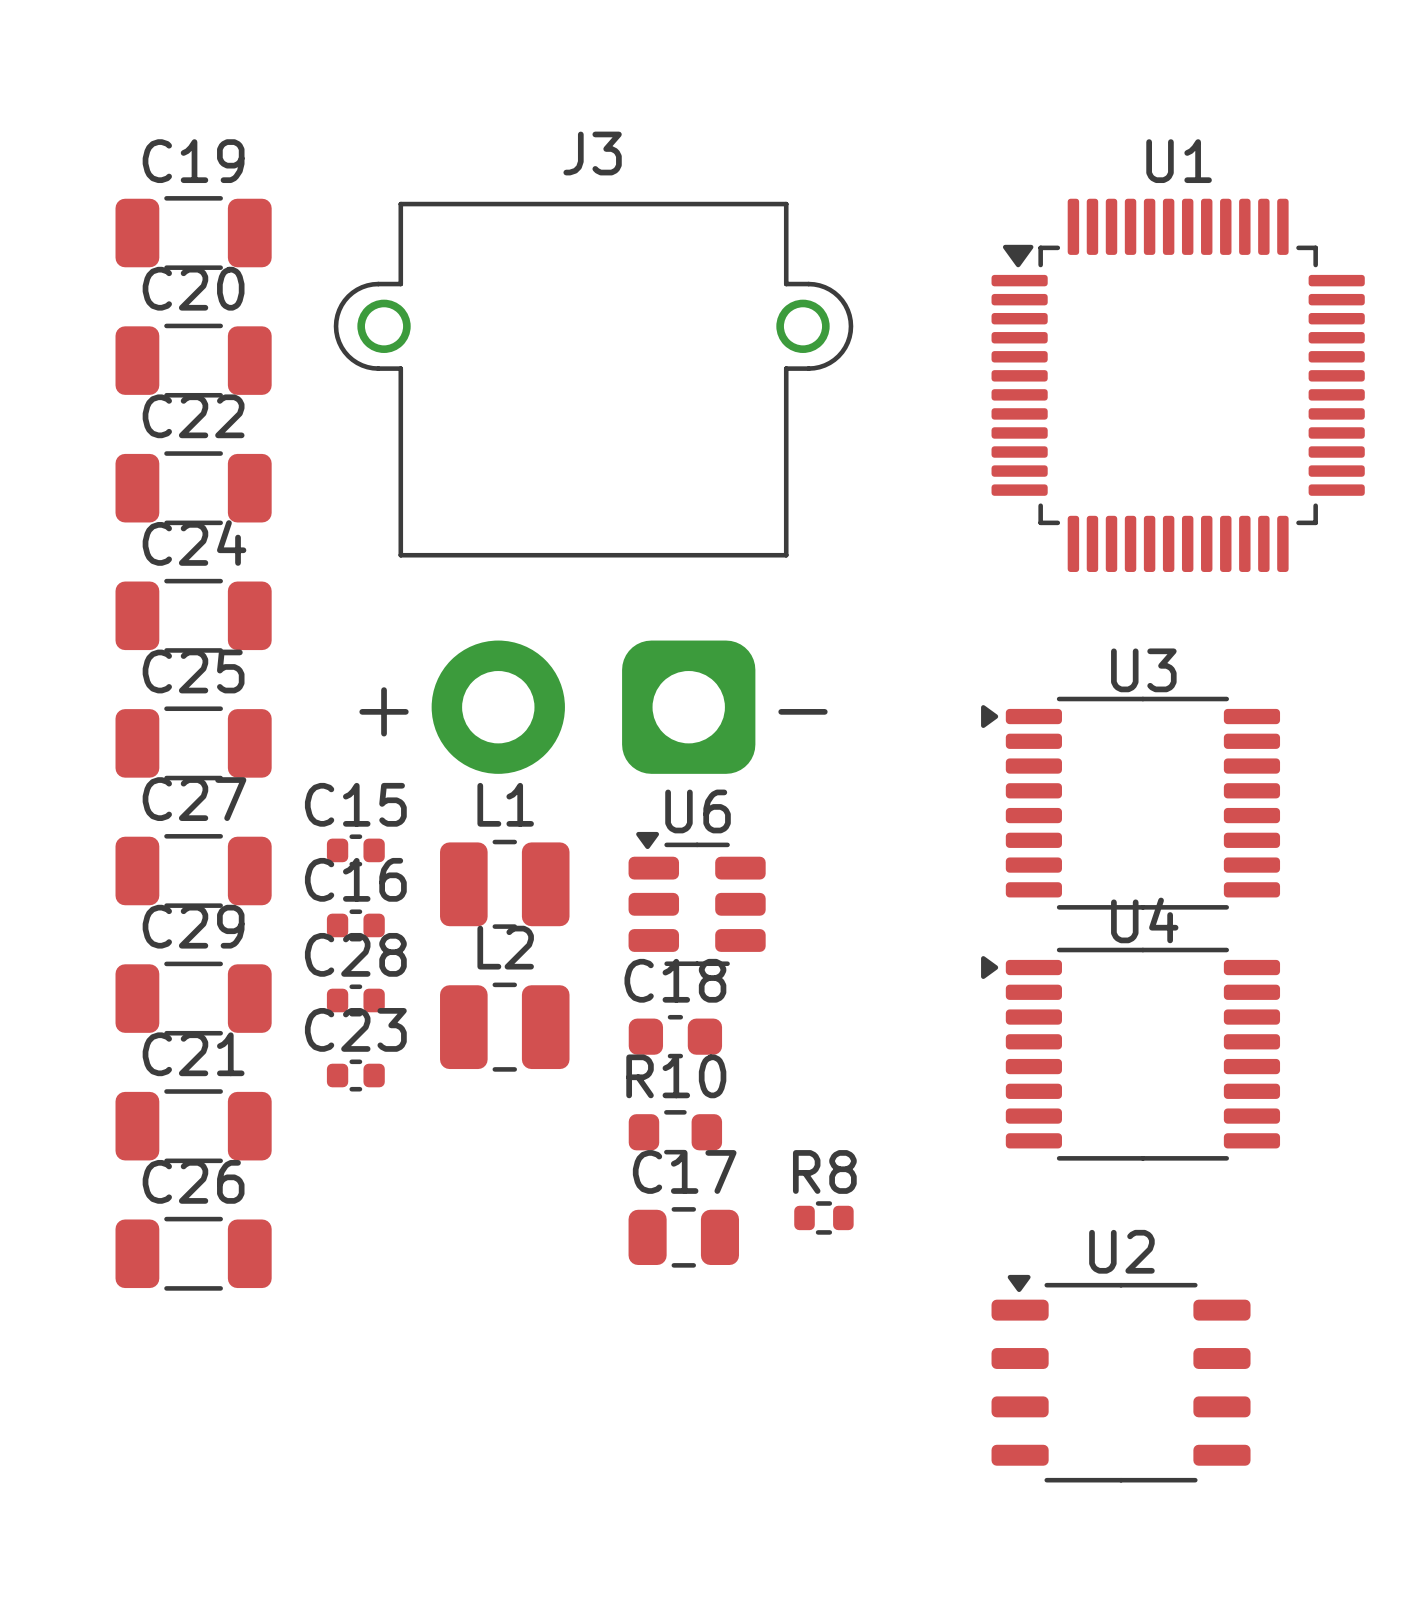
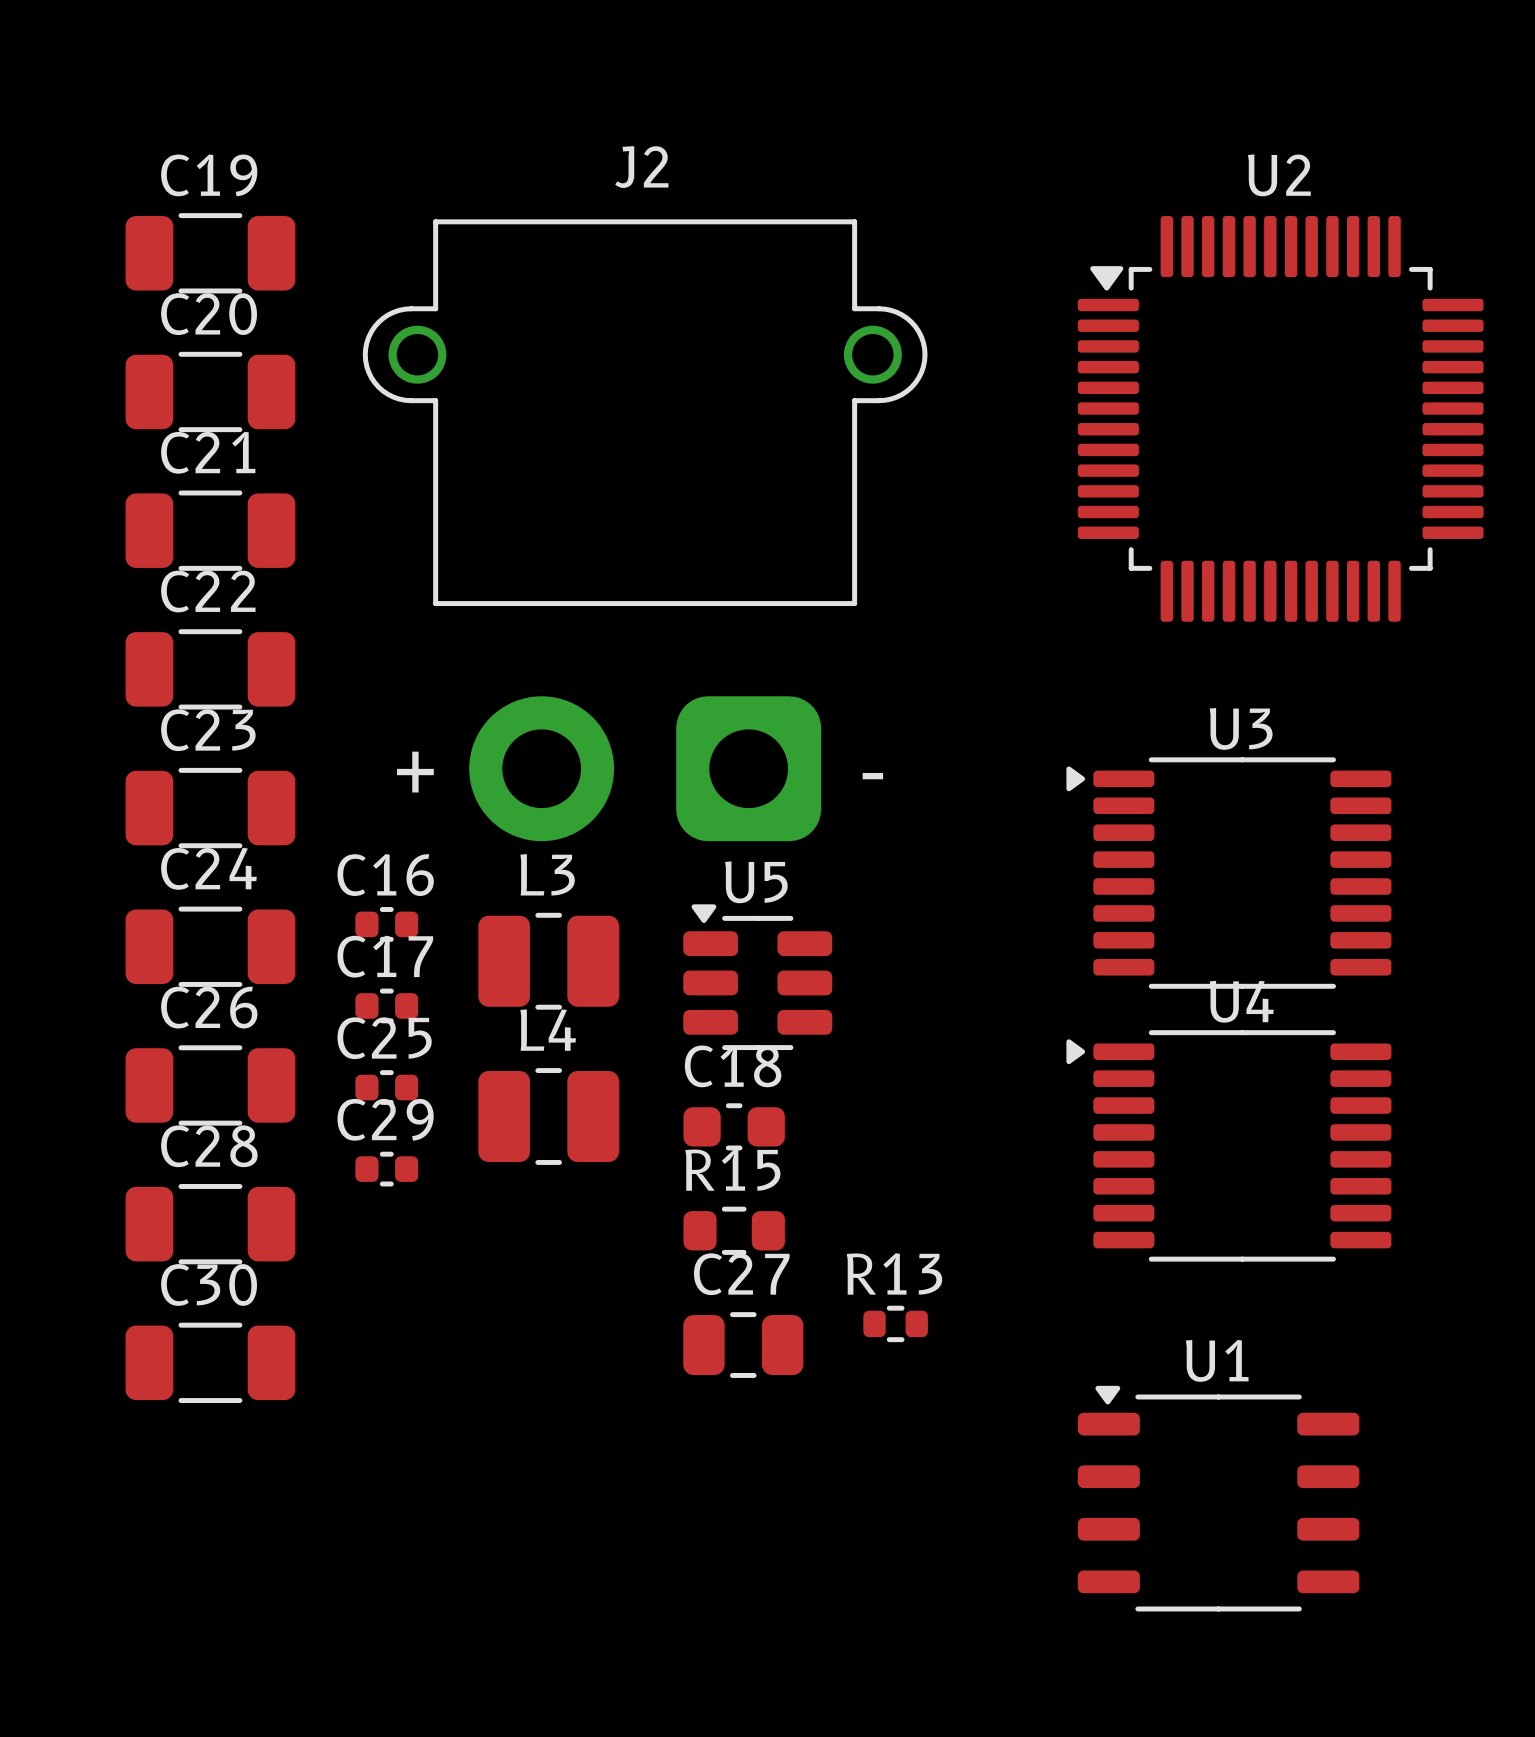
J3 name: J3 (592, 153) -> J2 (641, 167)
U1 name: U1 (1179, 161) -> U2 (1279, 175)
C22 name: C22 (193, 416) -> C21 (208, 452)
C24 name: C24 (194, 543) -> C22 (208, 591)
C25 name: C25 (193, 671) -> C23 (208, 730)
C27 name: C27 (194, 799) -> C24 (208, 868)
C15 name: C15 (355, 804) -> C16 (385, 875)
L1 name: L1 (505, 804) -> L3 (547, 874)
U6 name: U6 (698, 811) -> U5 (756, 882)
C16 name: C16 (355, 879) -> C17 (385, 956)
C29 name: C29 (193, 926) -> C26 (209, 1007)
L2 name: L2 (505, 947) -> L4 (548, 1030)
C28 name: C28 (355, 954) -> C25 (384, 1038)
C23 name: C23 (355, 1029) -> C29 (385, 1119)
C21 name: C21 (193, 1054) -> C28 (209, 1146)
R10 name: R10 (676, 1076) -> R15 (732, 1170)
C17 name: C17 (684, 1171) -> C27 (741, 1274)
R8 name: R8 (824, 1171) -> R13 (894, 1273)
C26 name: C26 (193, 1181) -> C30 (209, 1284)
U2 name: U2 (1121, 1251) -> U1 (1217, 1360)

